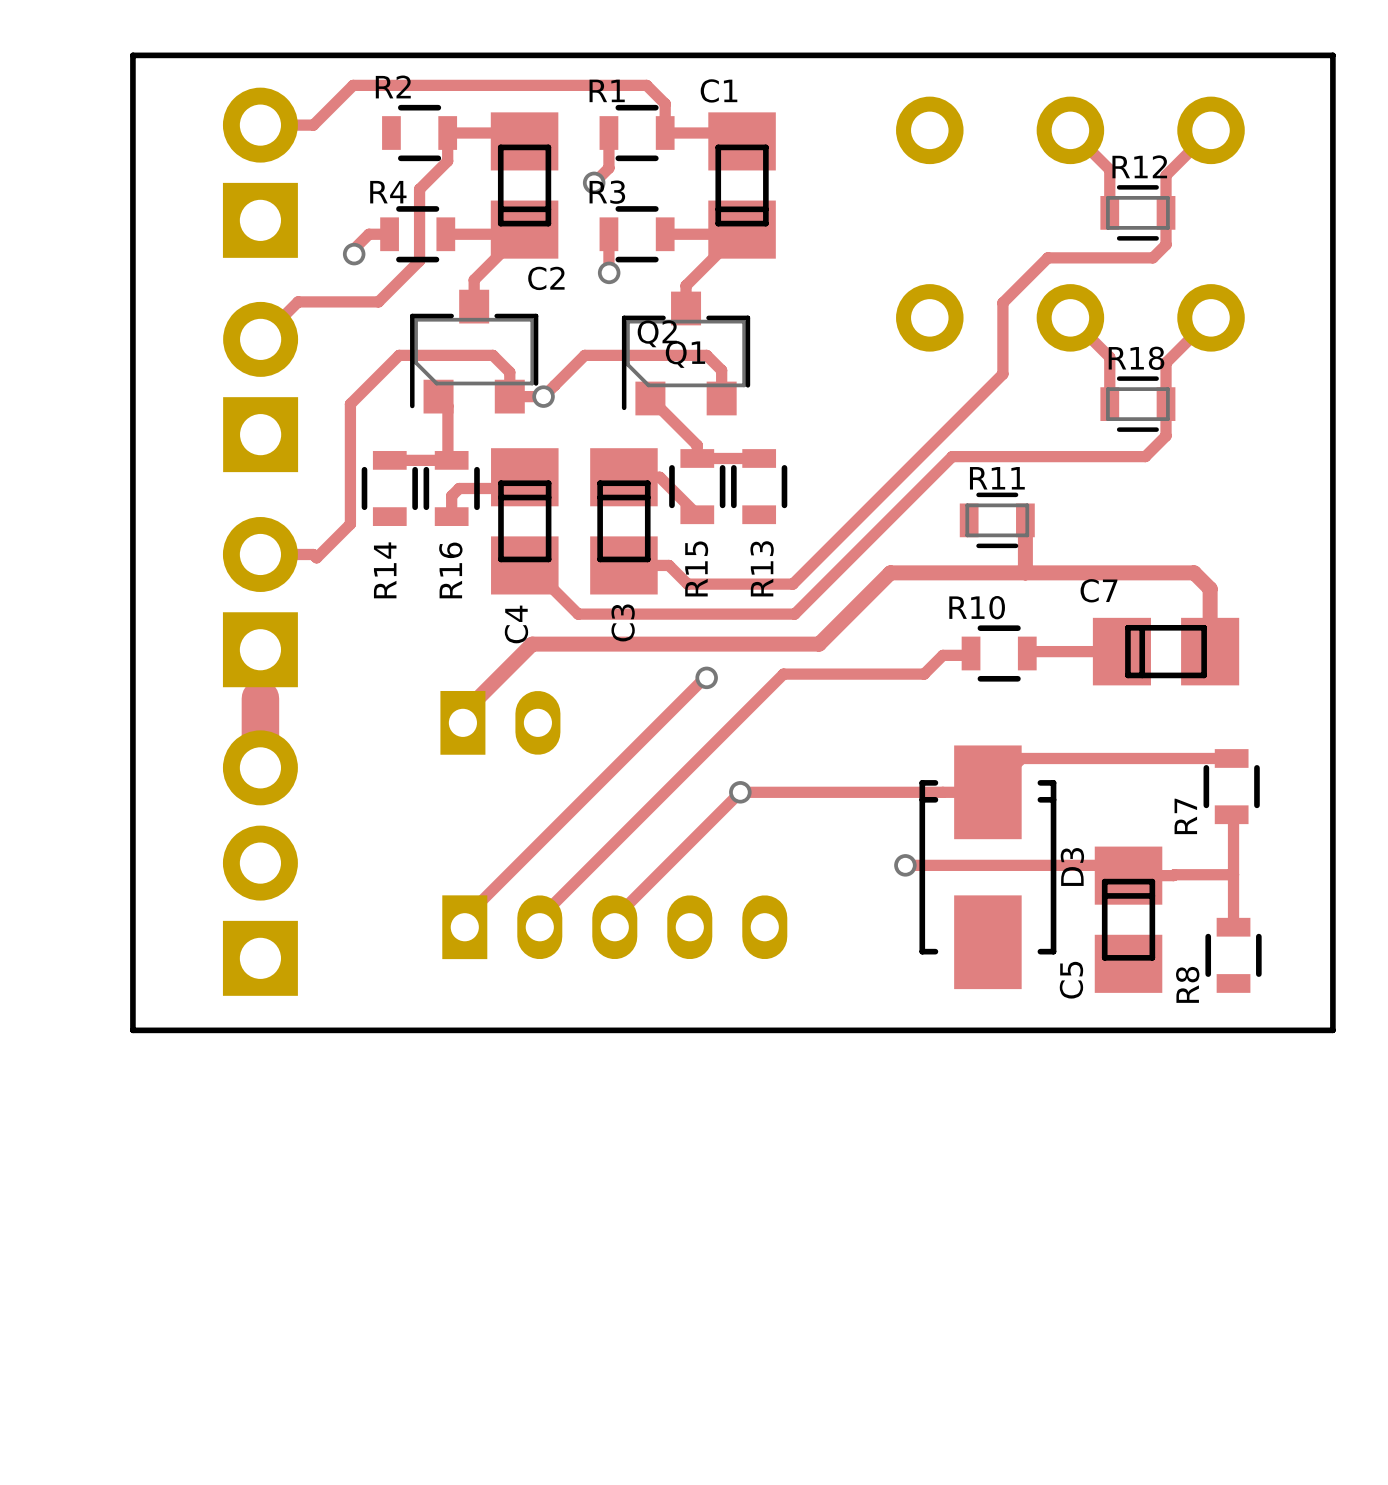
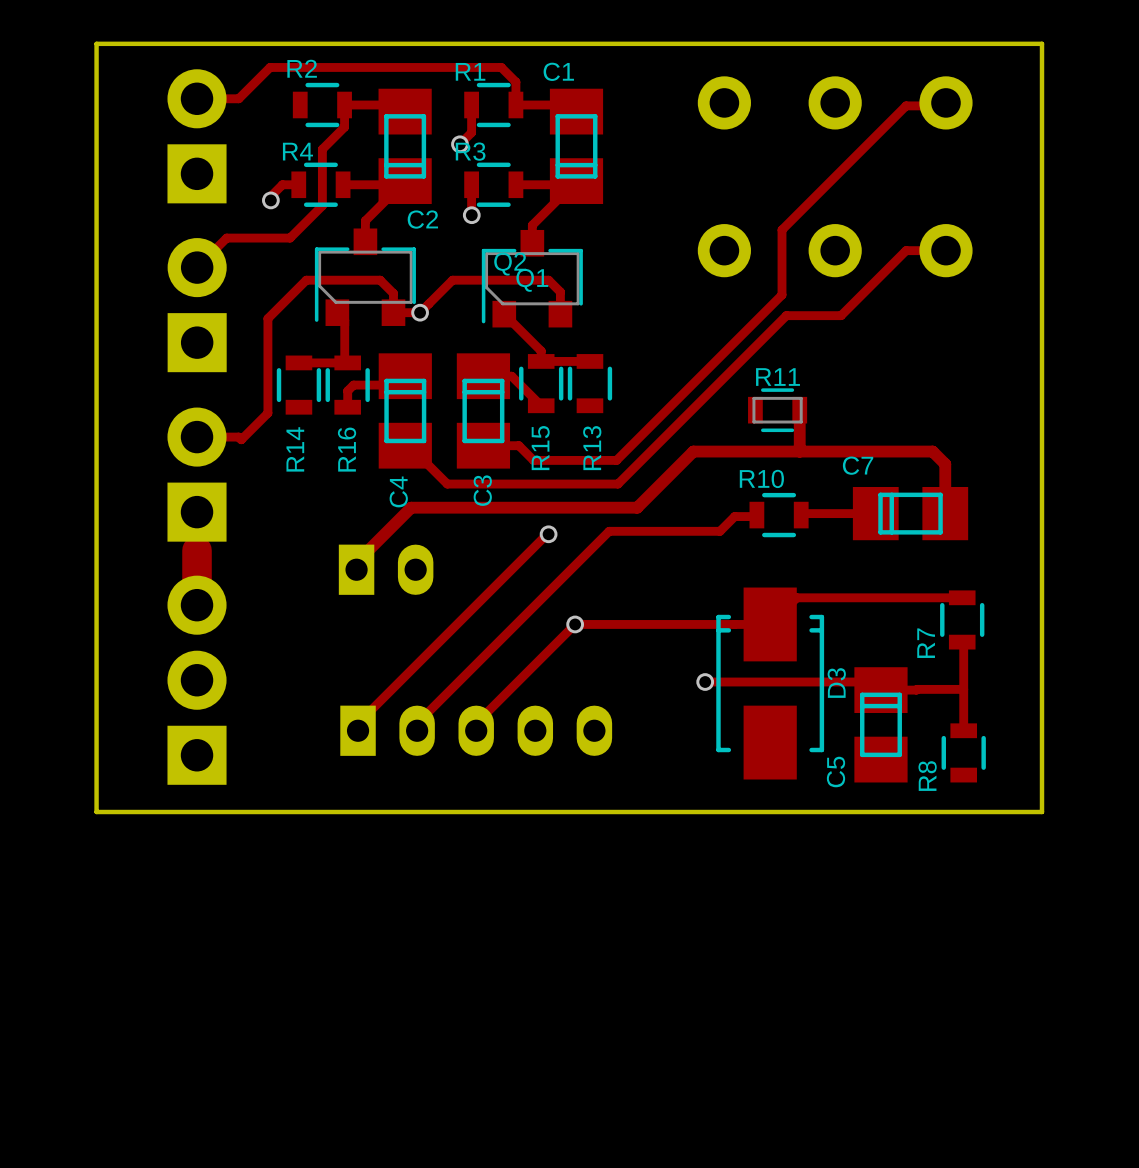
track: (1070, 130) (1109, 169) (1109, 212) -> none
track: (1207, 134) (1166, 175) (1166, 244) (1152, 257) (1047, 257) (1002, 302) -> (943, 105) (906, 105) (782, 229) (782, 238)
R12: (1137, 212) -> none
track: (1070, 317) (1109, 357) (1109, 404) -> none
track: (1211, 317) (1166, 362) (1166, 435) (1145, 456) (952, 456) -> (945, 250) (906, 250) (841, 315) (786, 315) (742, 359)
R18: (1137, 404) -> none

